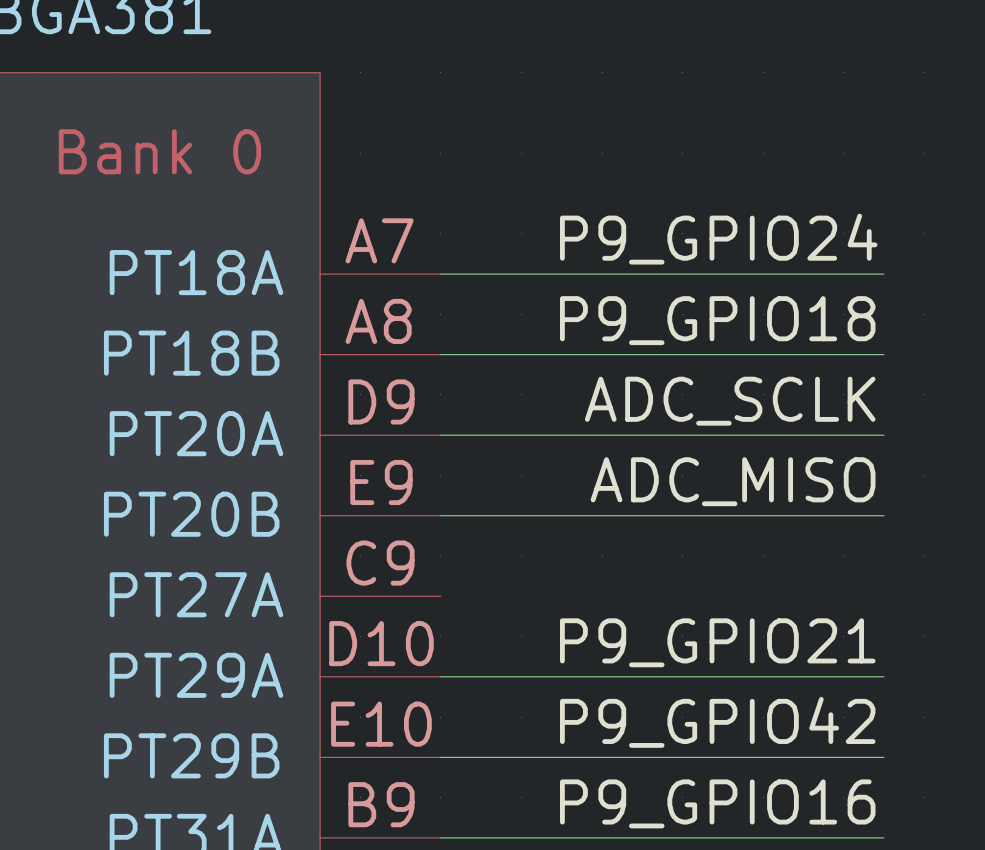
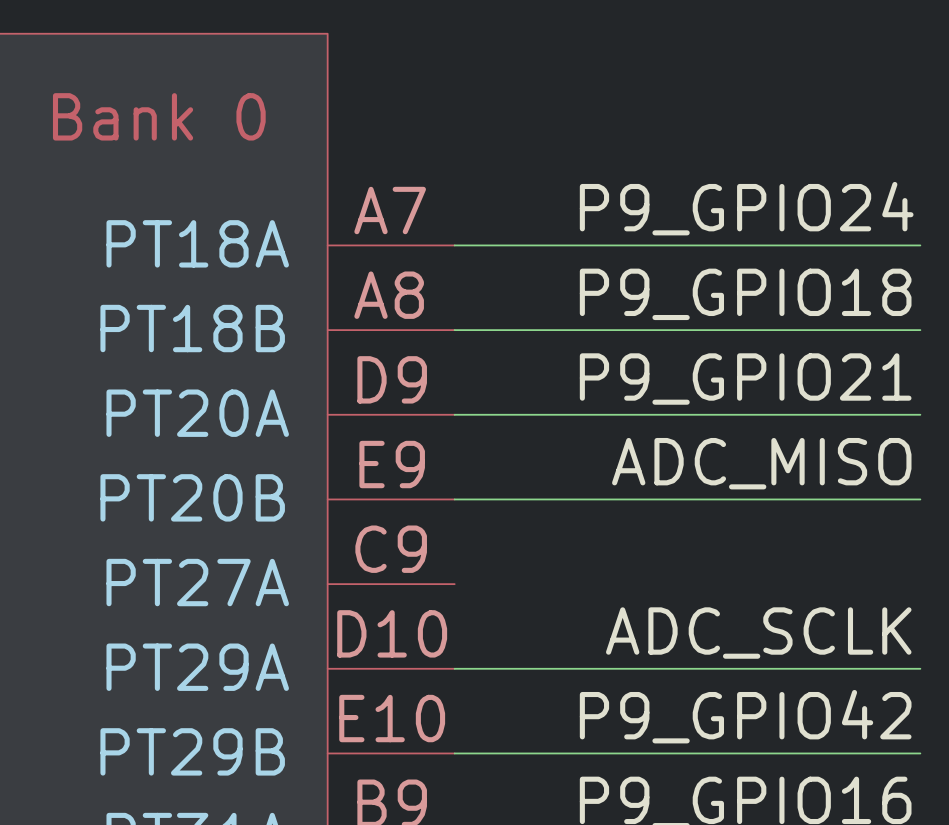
label: ADC_SCLK (730, 401) -> P9_GPIO21 (745, 379)
label: P9_GPIO21 (717, 642) -> ADC_SCLK (758, 633)

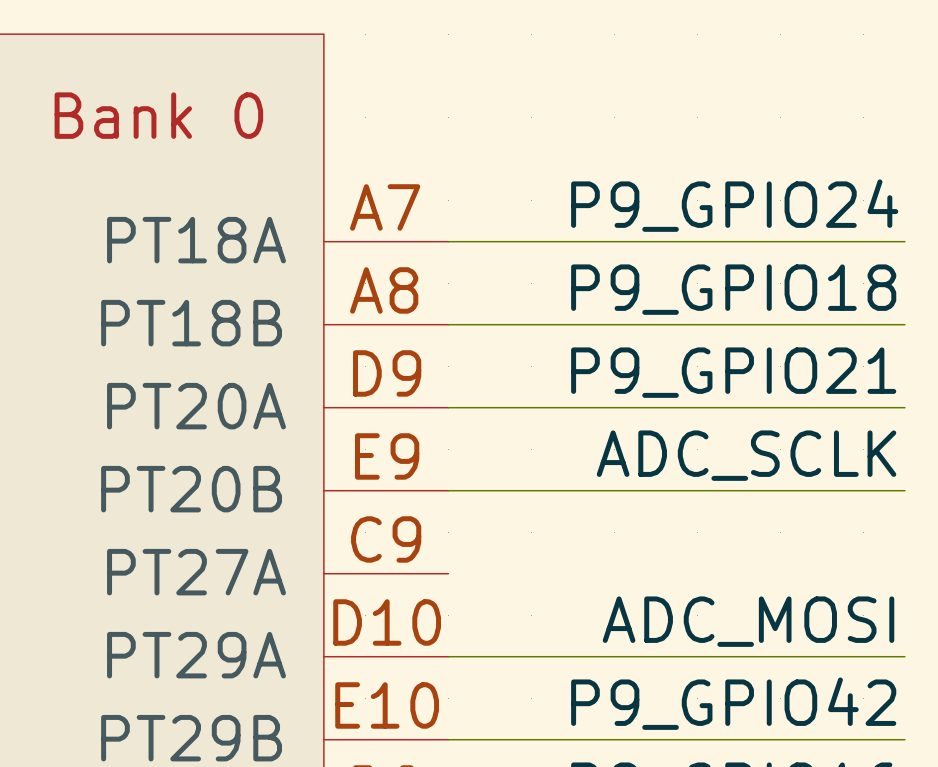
label: ADC_MISO (761, 463) -> ADC_SCLK (746, 455)
label: ADC_SCLK (758, 633) -> ADC_MOSI (748, 621)

